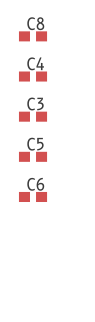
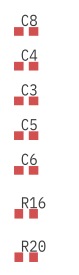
R16: none -> (26, 213)
R20: none -> (26, 257)

